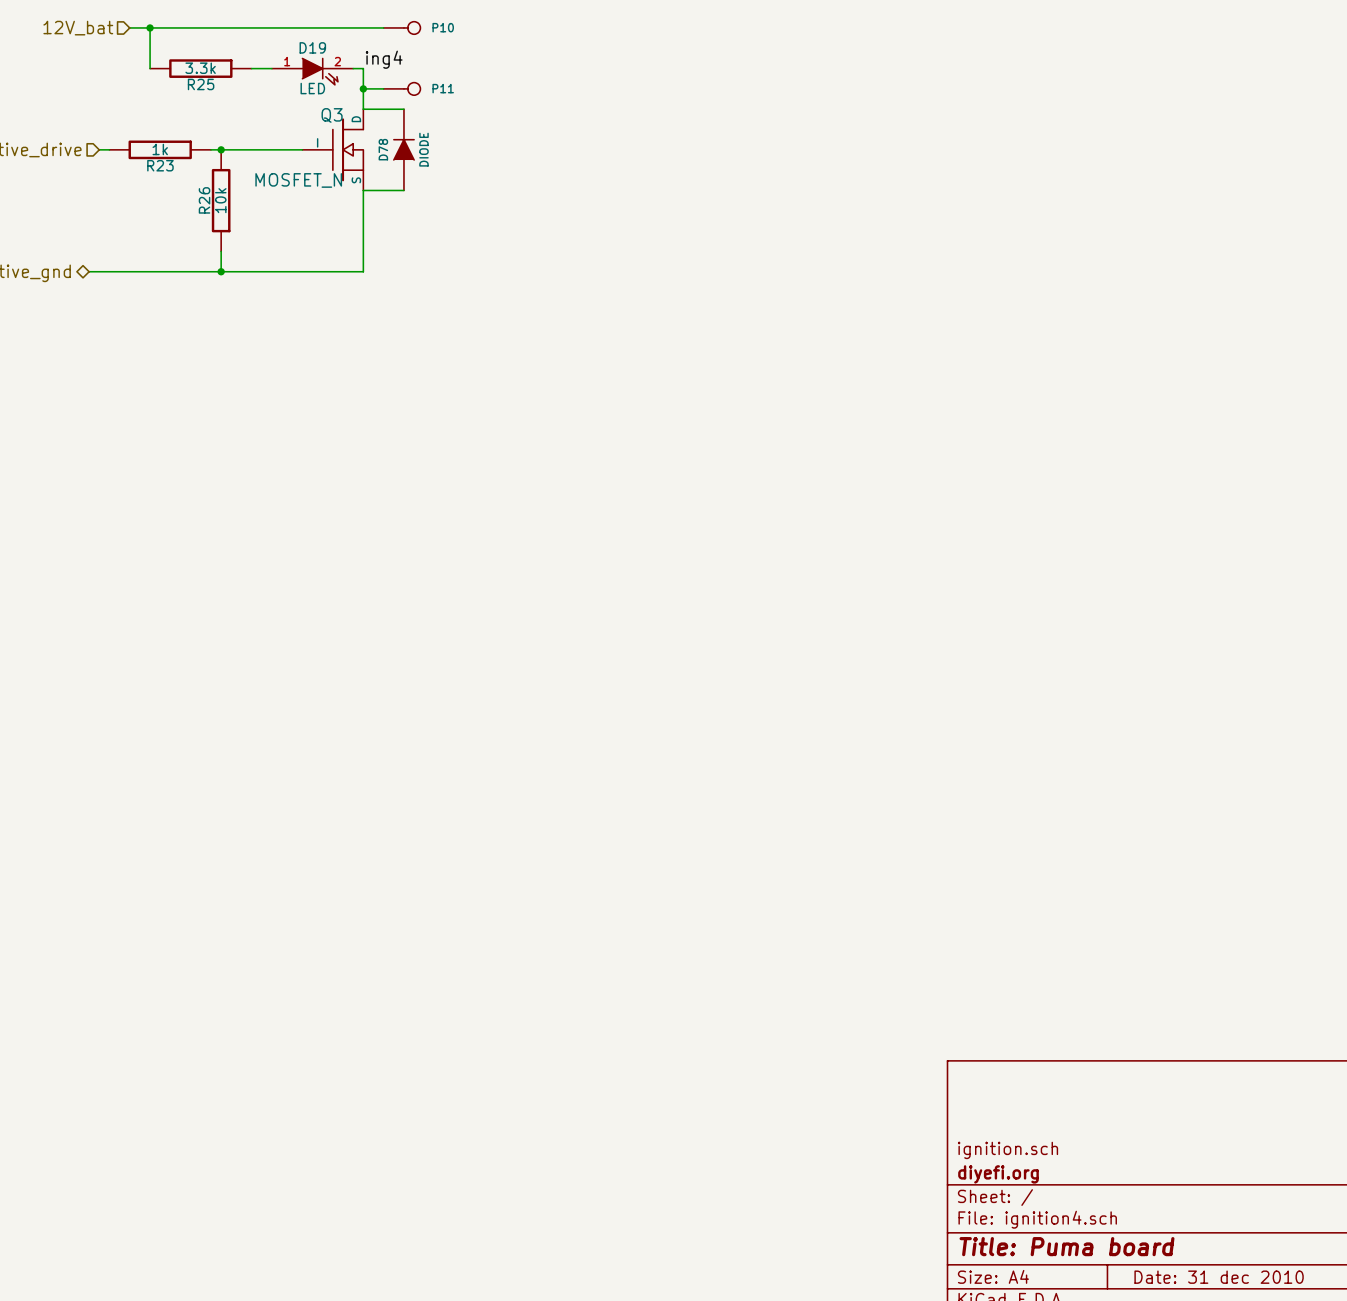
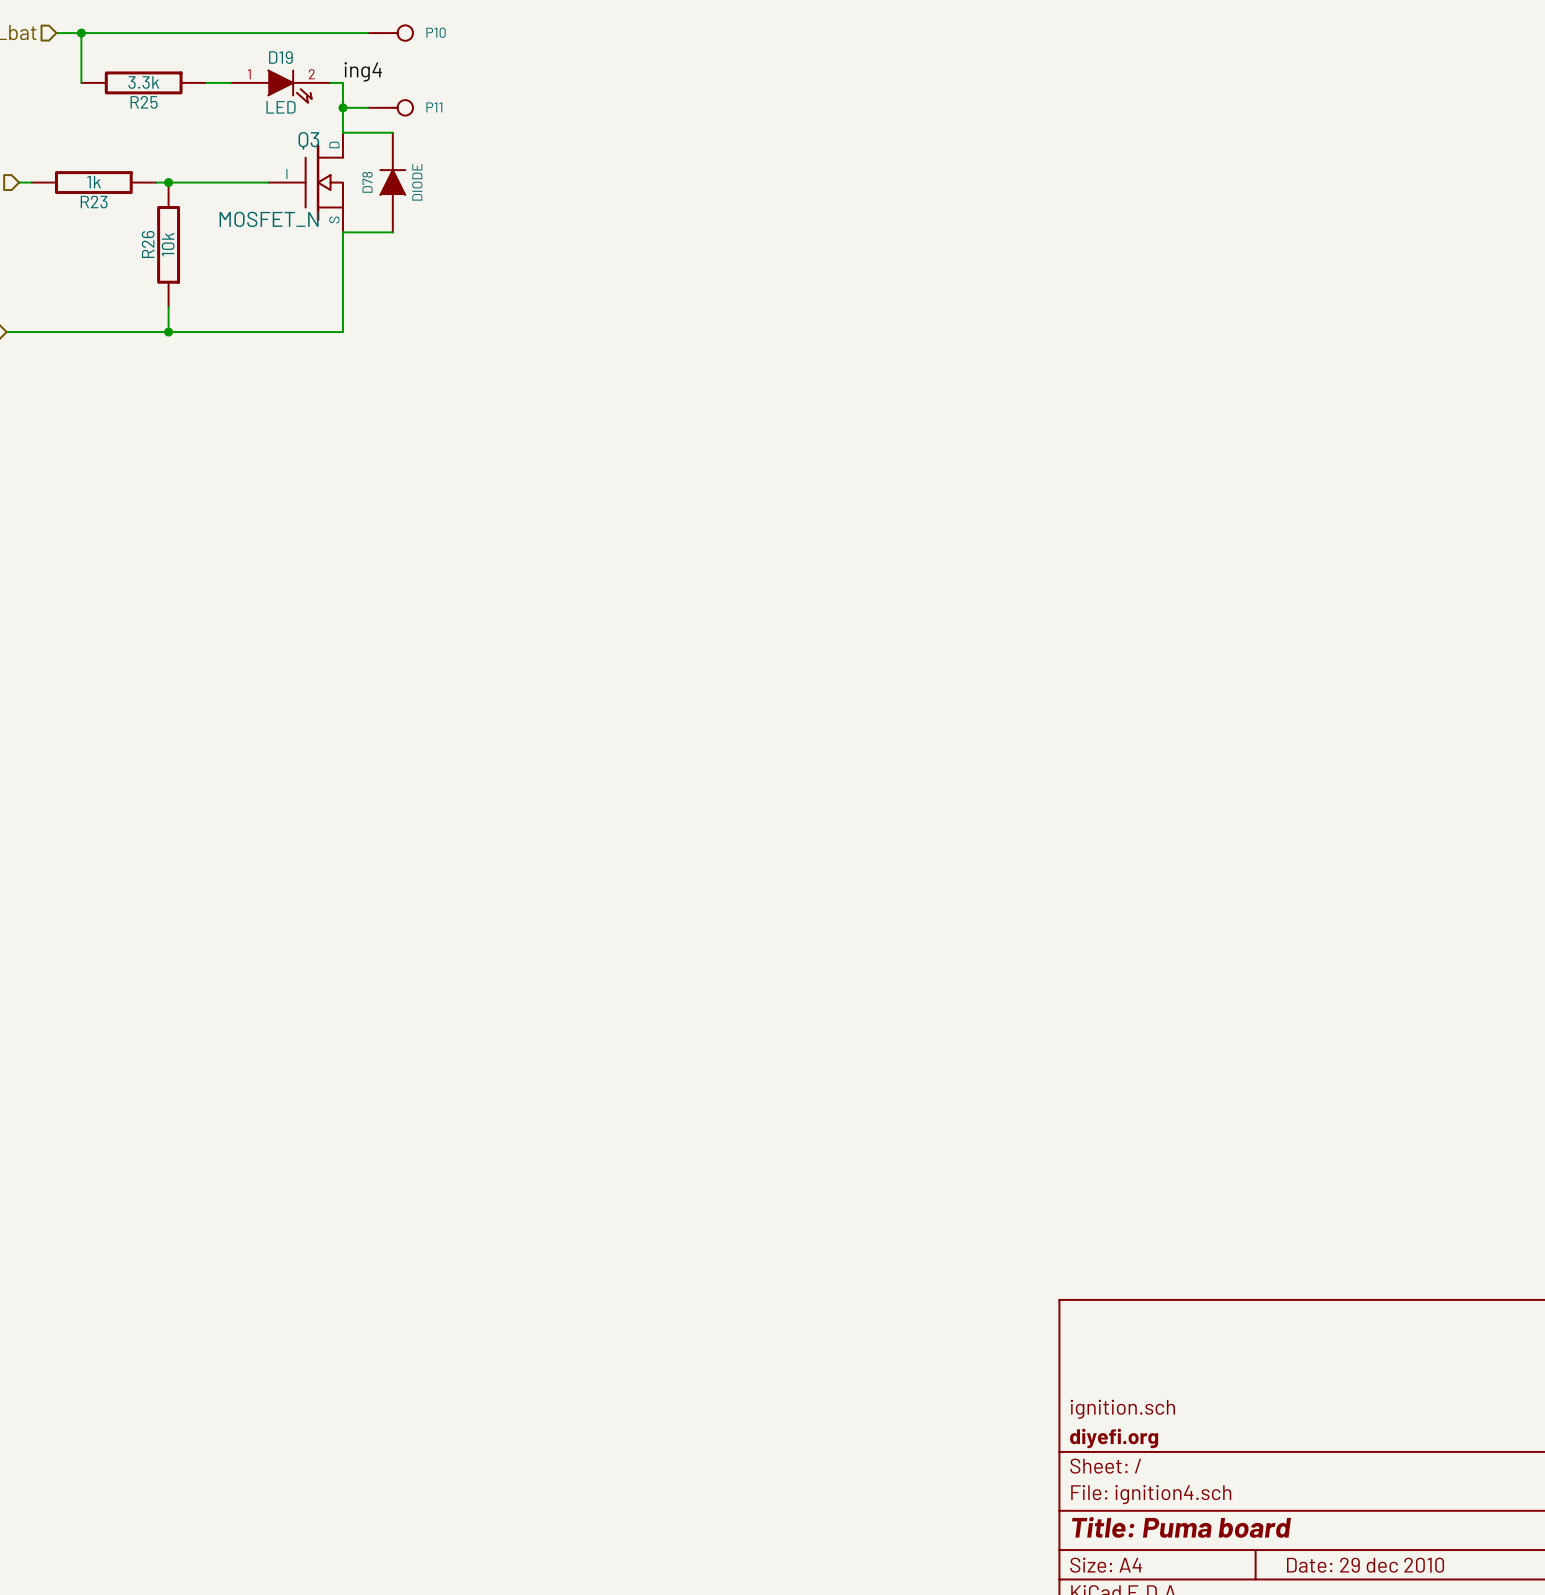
title block: Date: 31 dec 2010 (1219, 1277) -> Date: 29 dec 2010 (1365, 1565)

